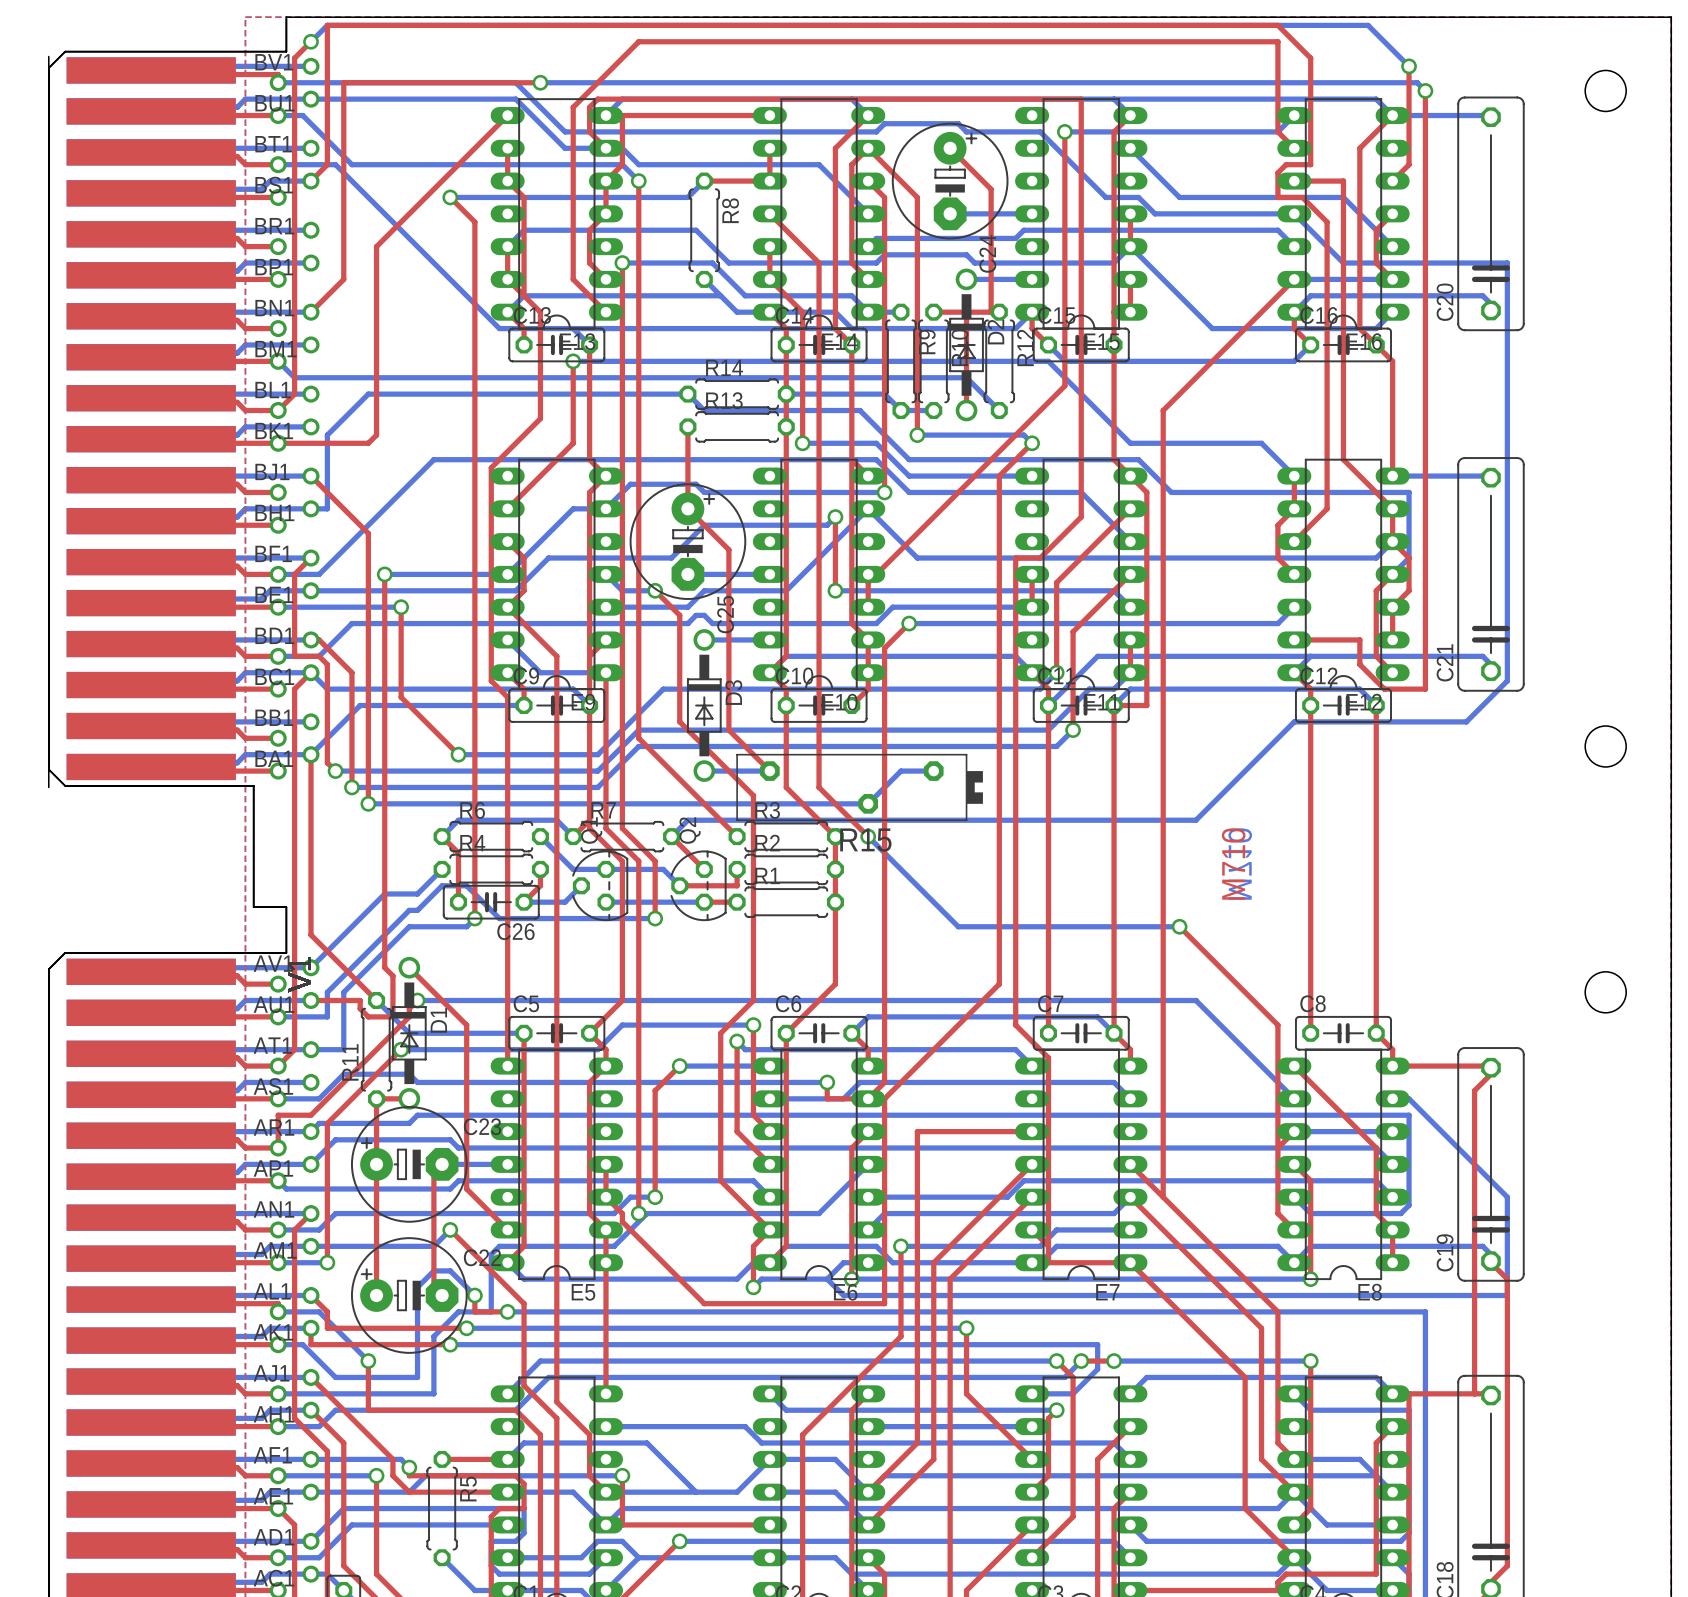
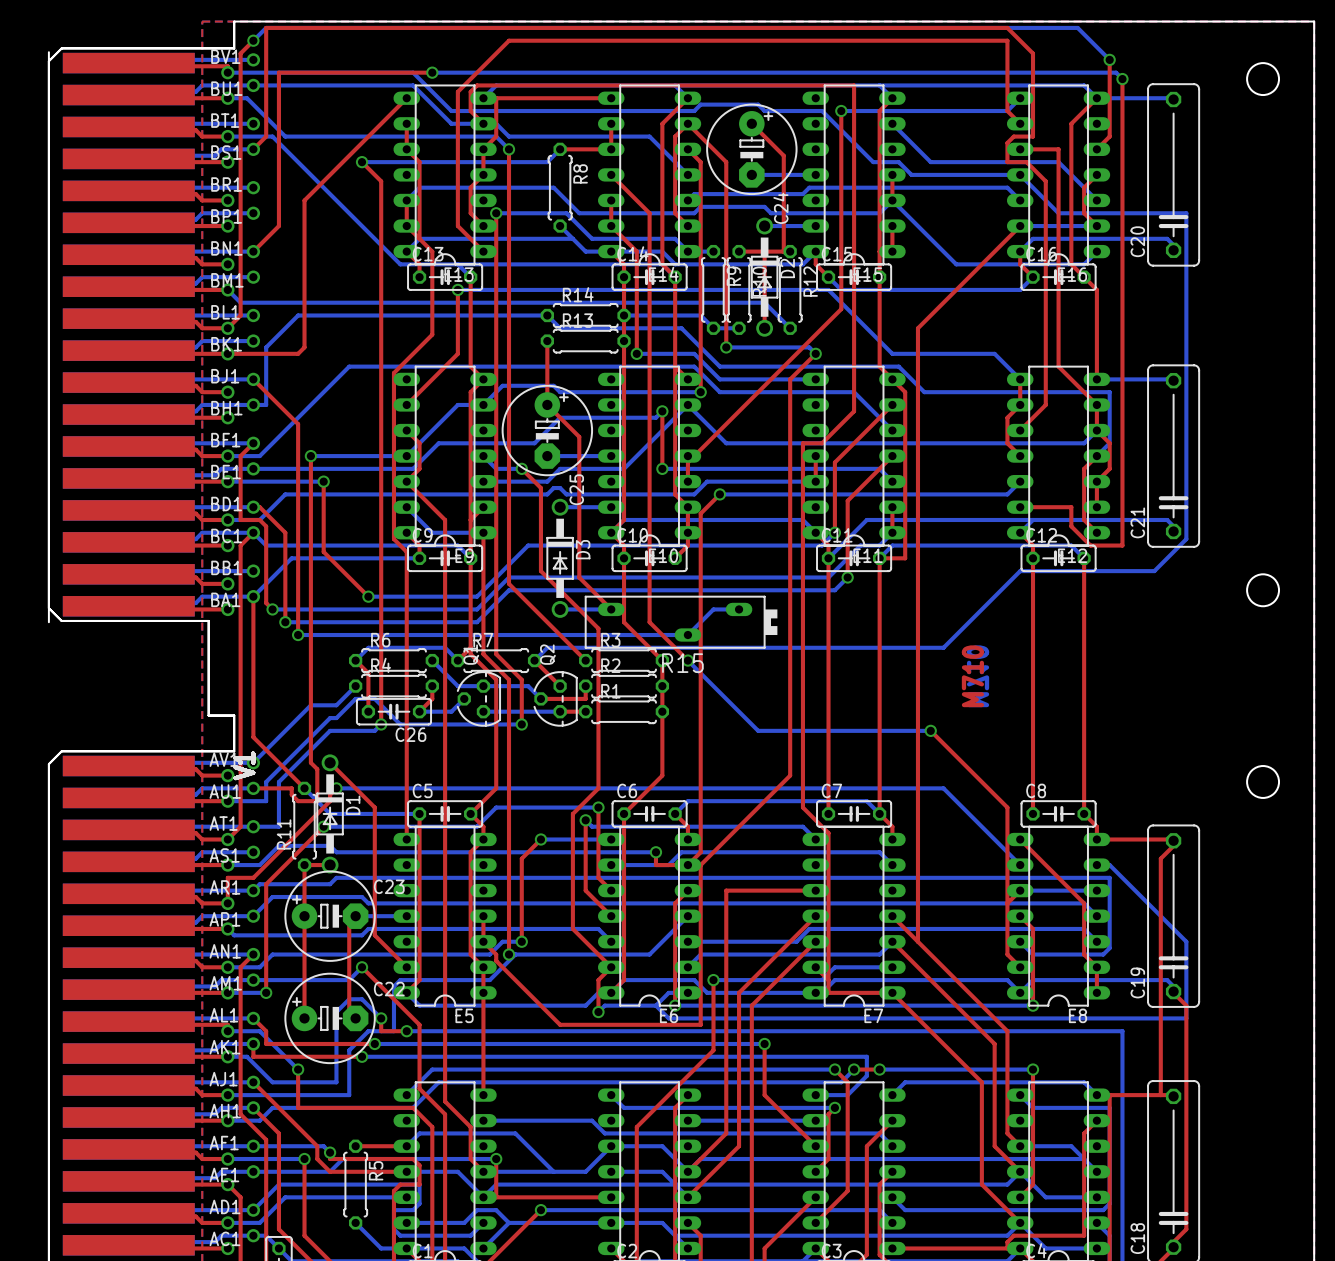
R15 footprint: [736, 753, 983, 822] -> [584, 595, 778, 649]

